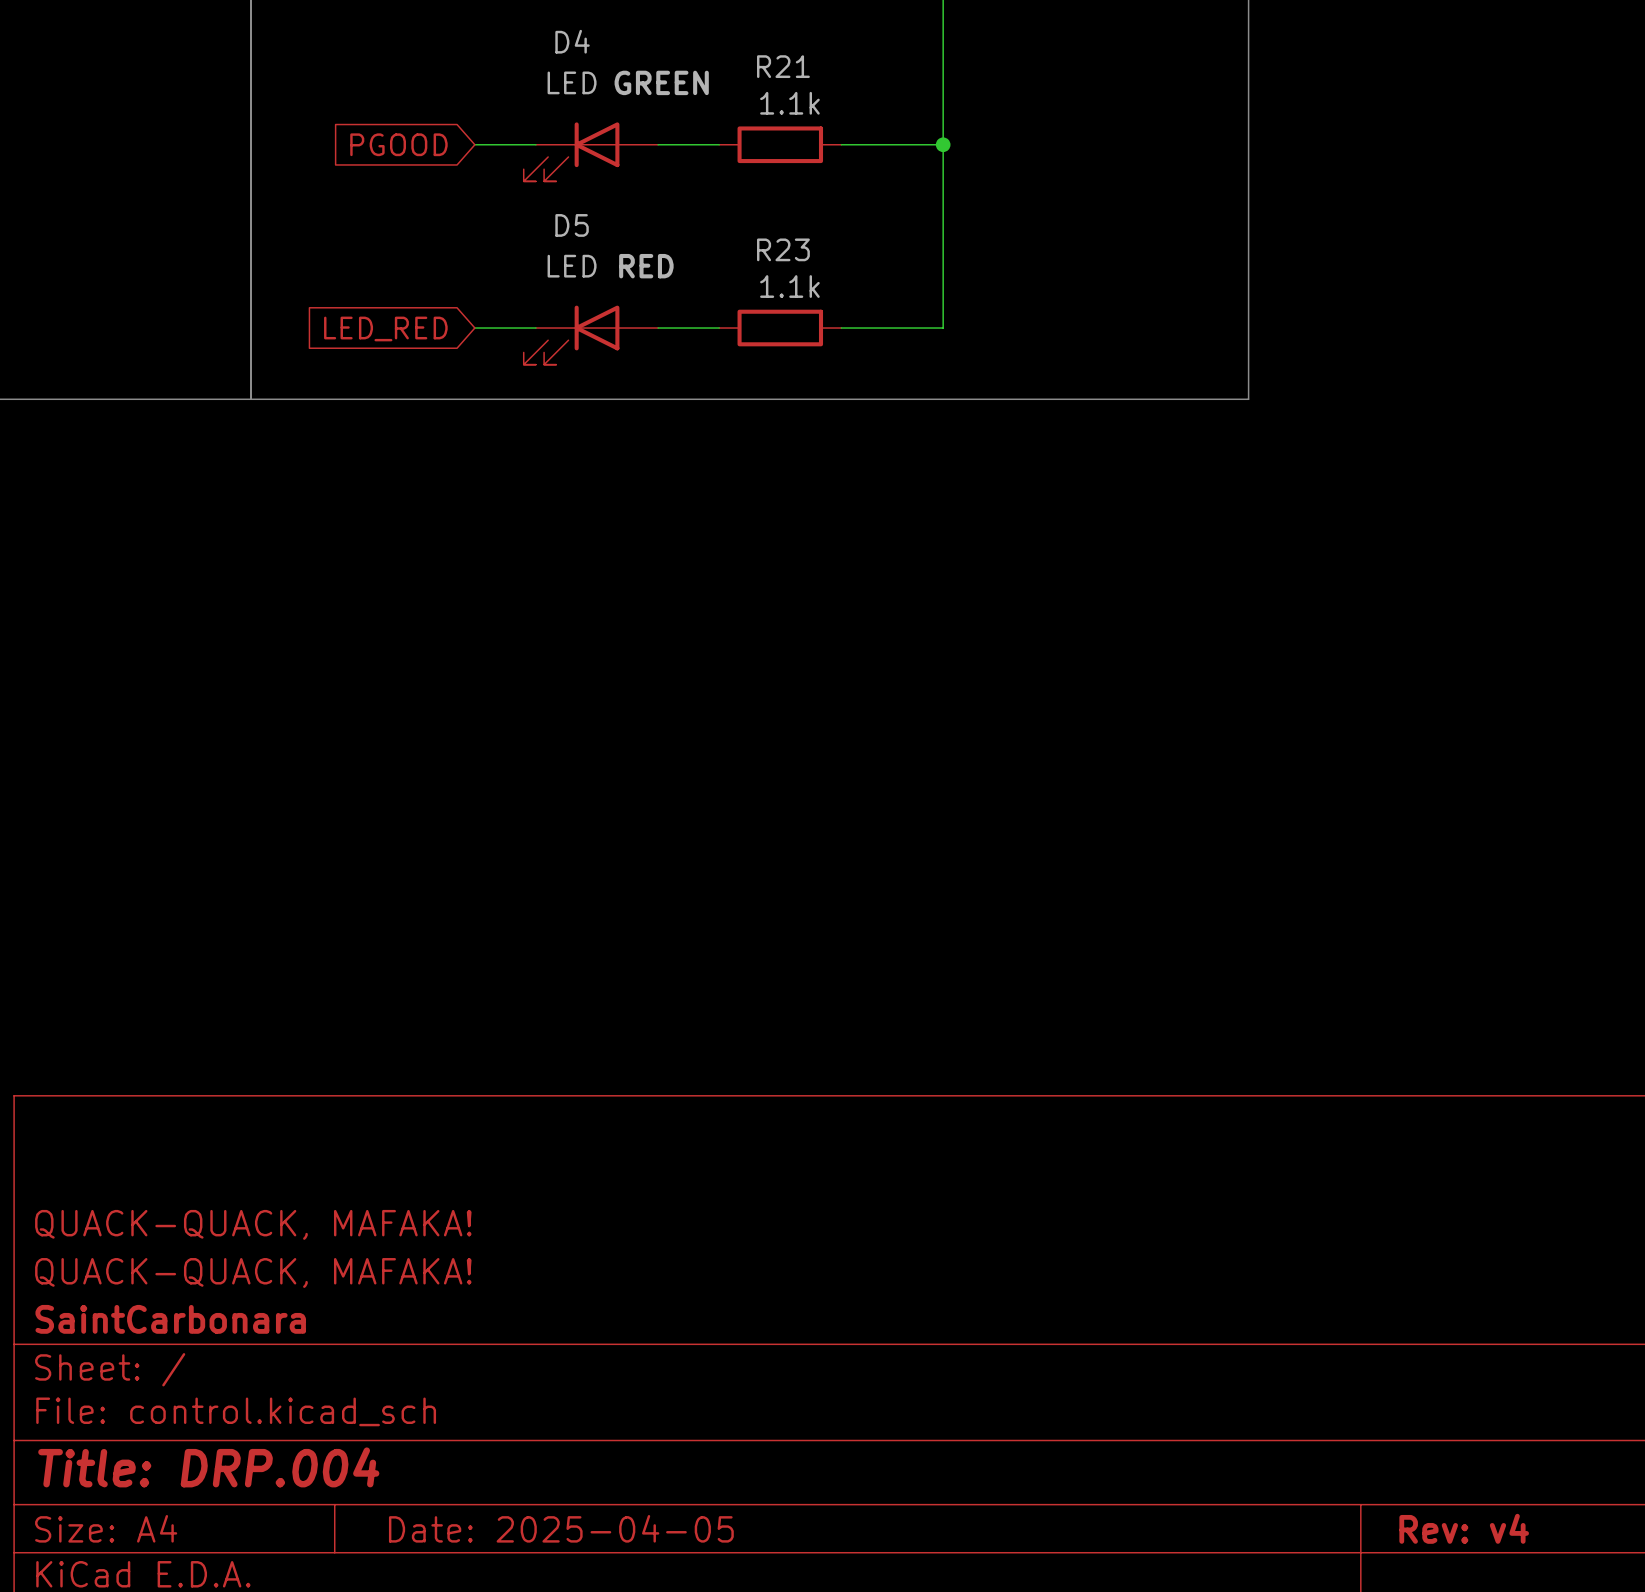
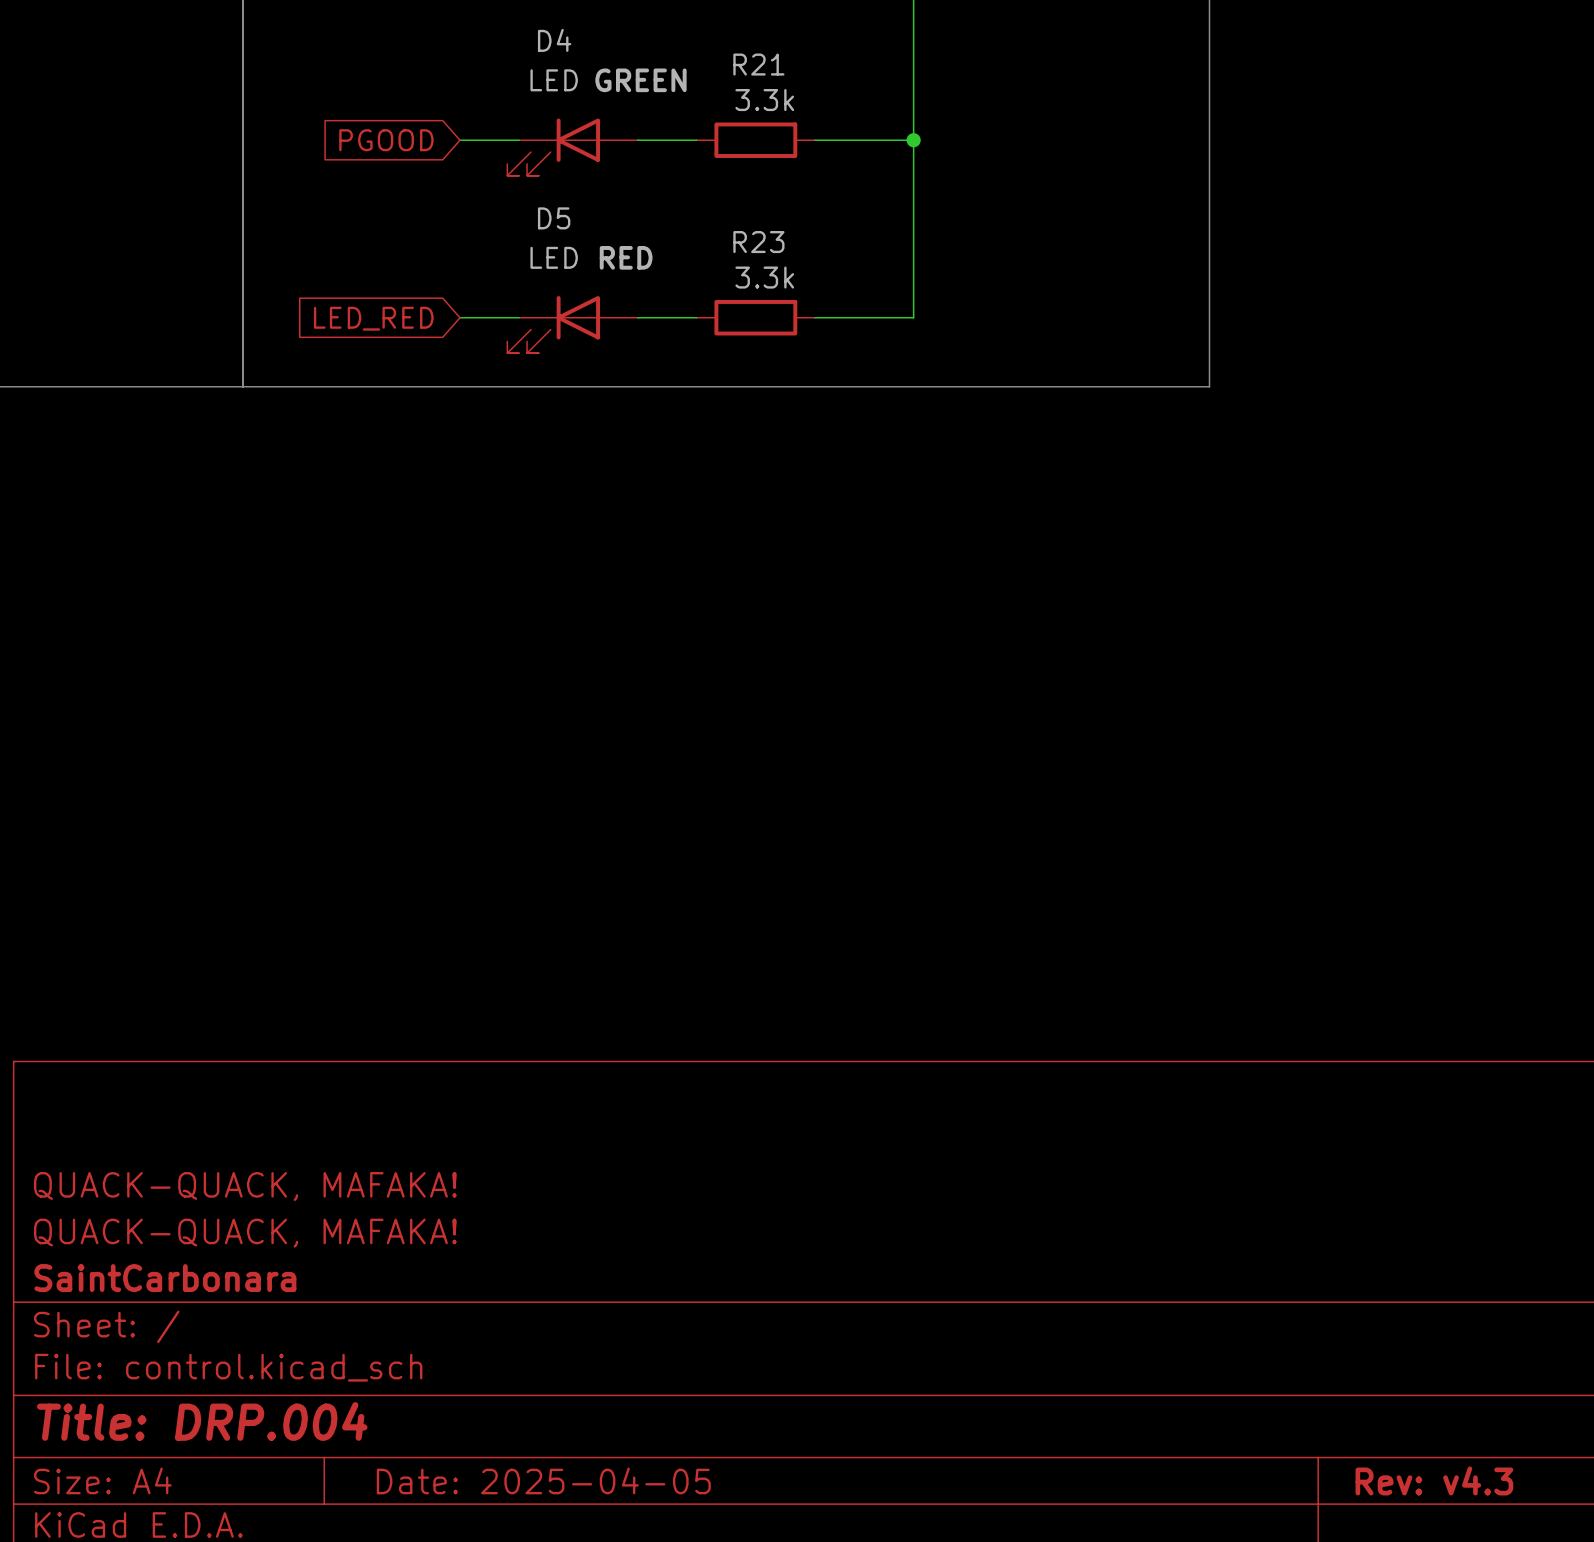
R21 value: 1.1k (789, 103) -> 3.3k (764, 100)
R23 value: 1.1k (789, 286) -> 3.3k (764, 277)
title block: Rev: v4 (1464, 1528) -> Rev: v4.3 (1434, 1480)

